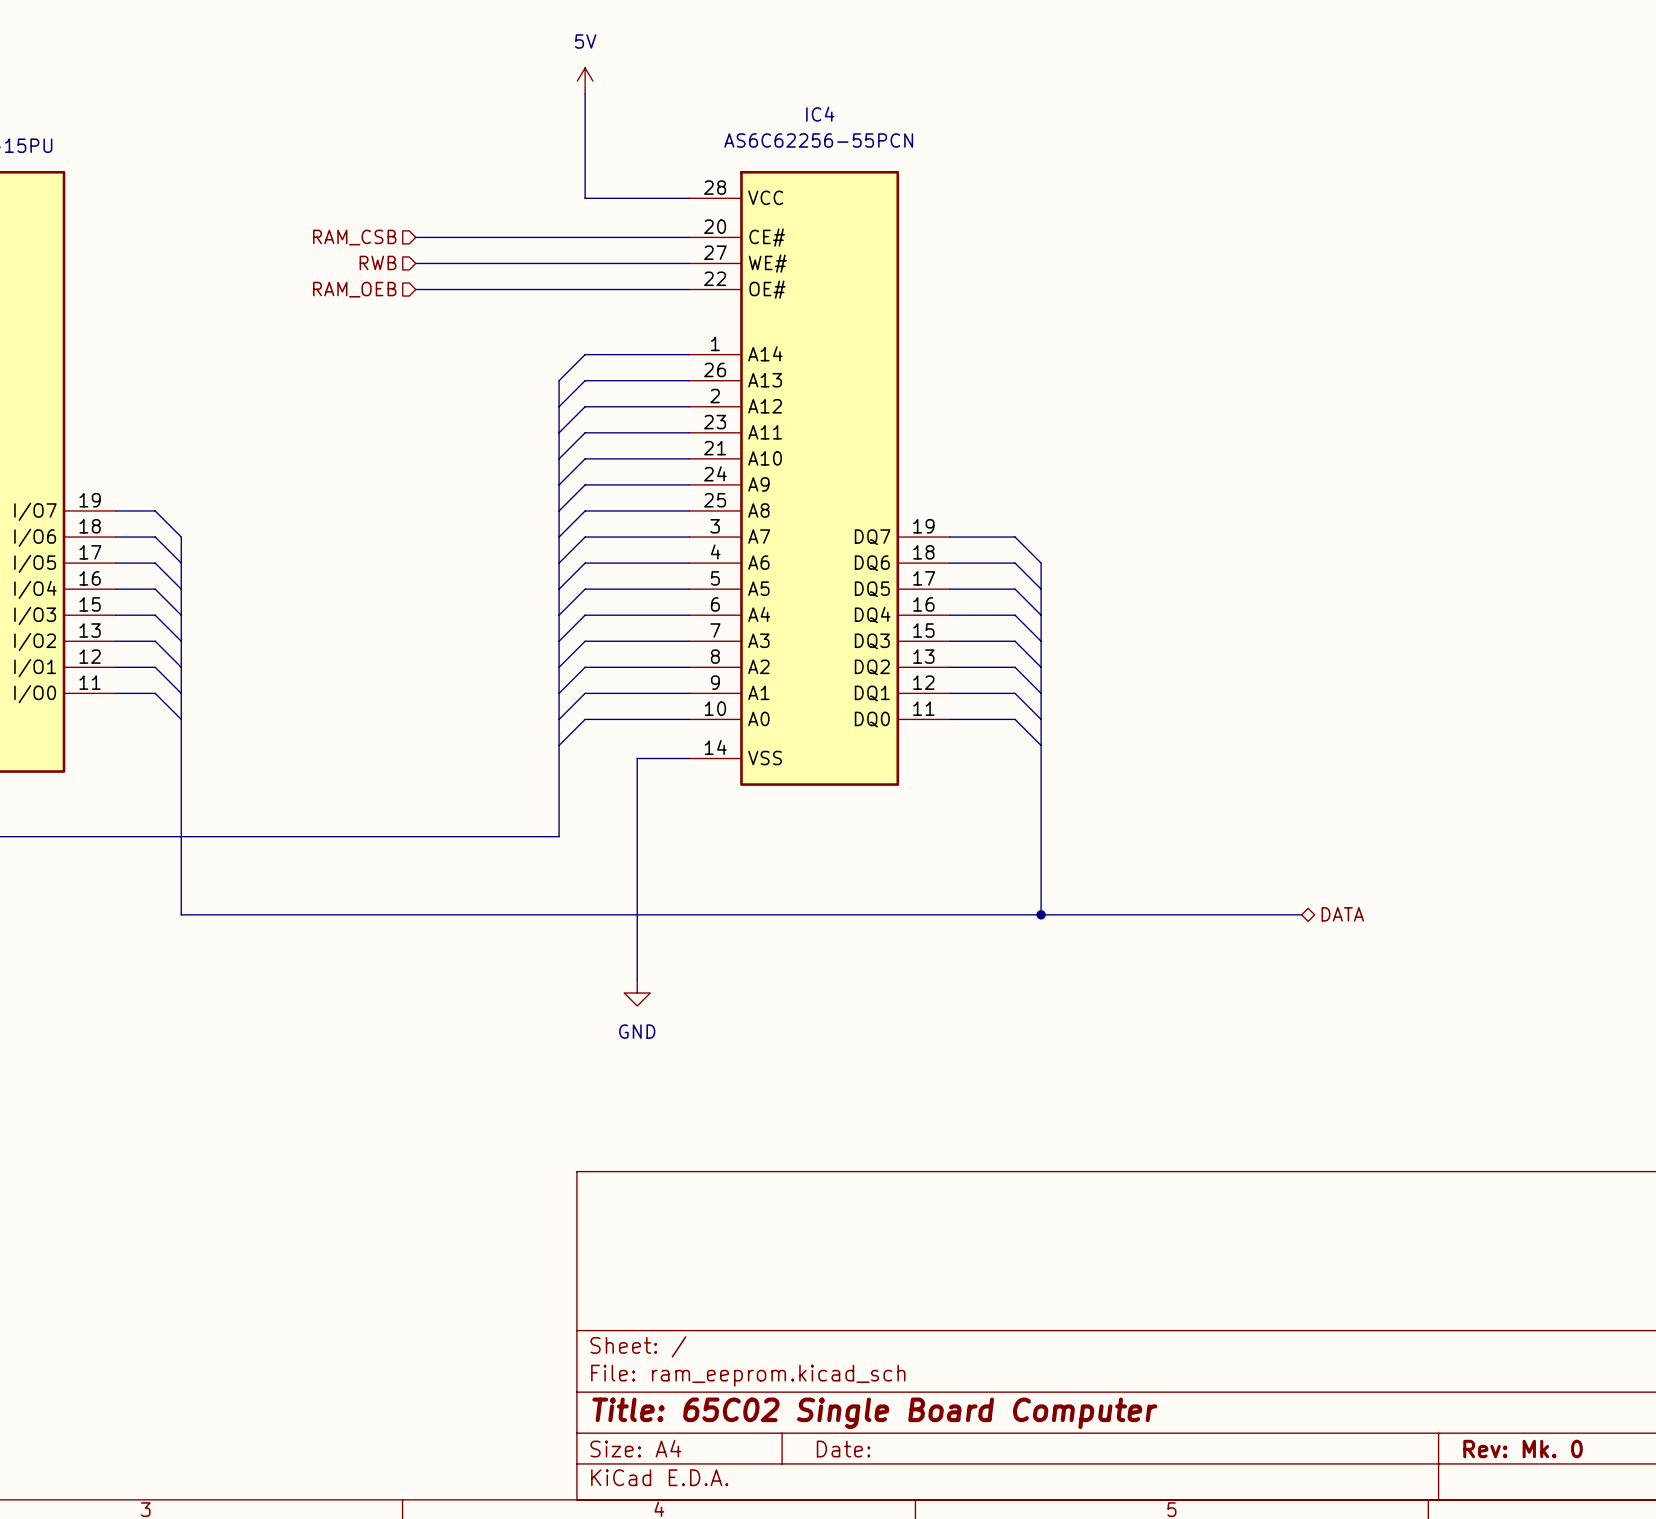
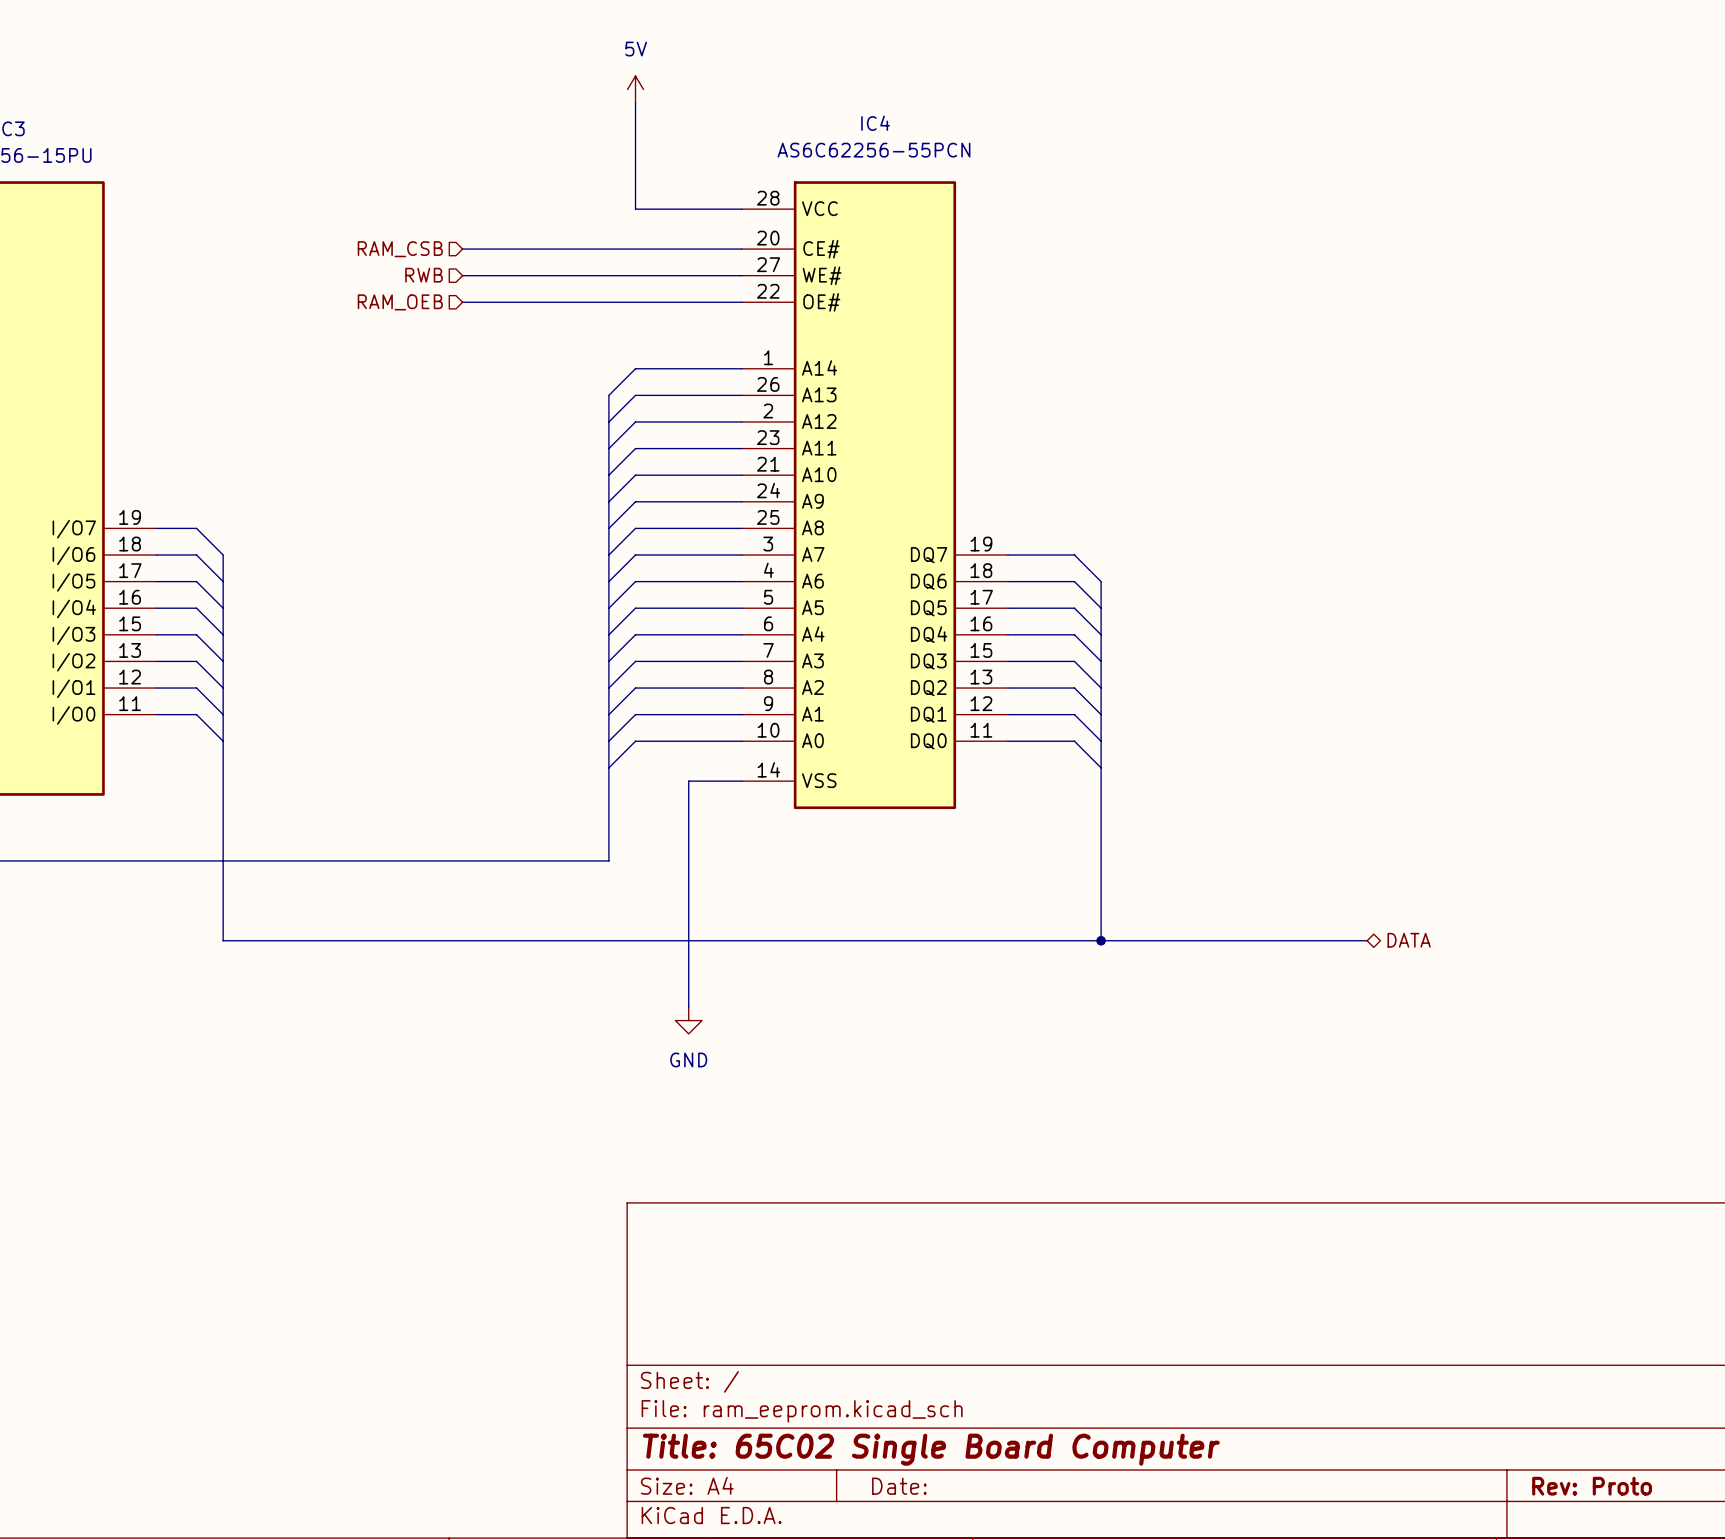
title block: Rev: Mk. 0 (1523, 1449) -> Rev: Proto (1592, 1486)

